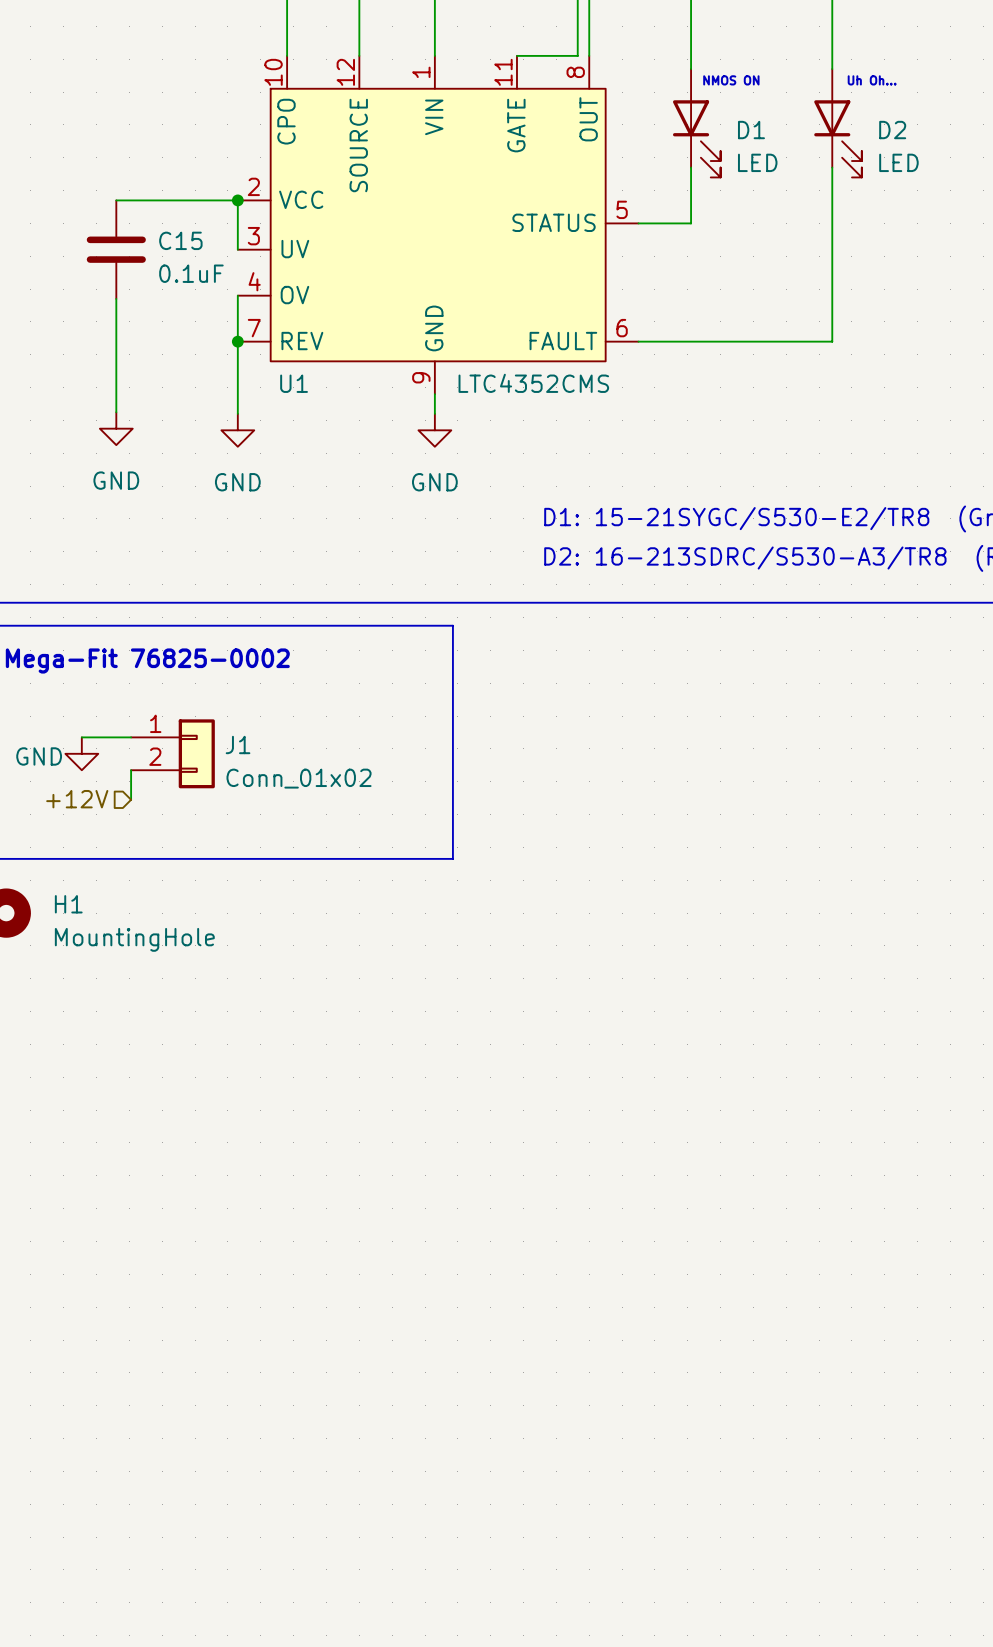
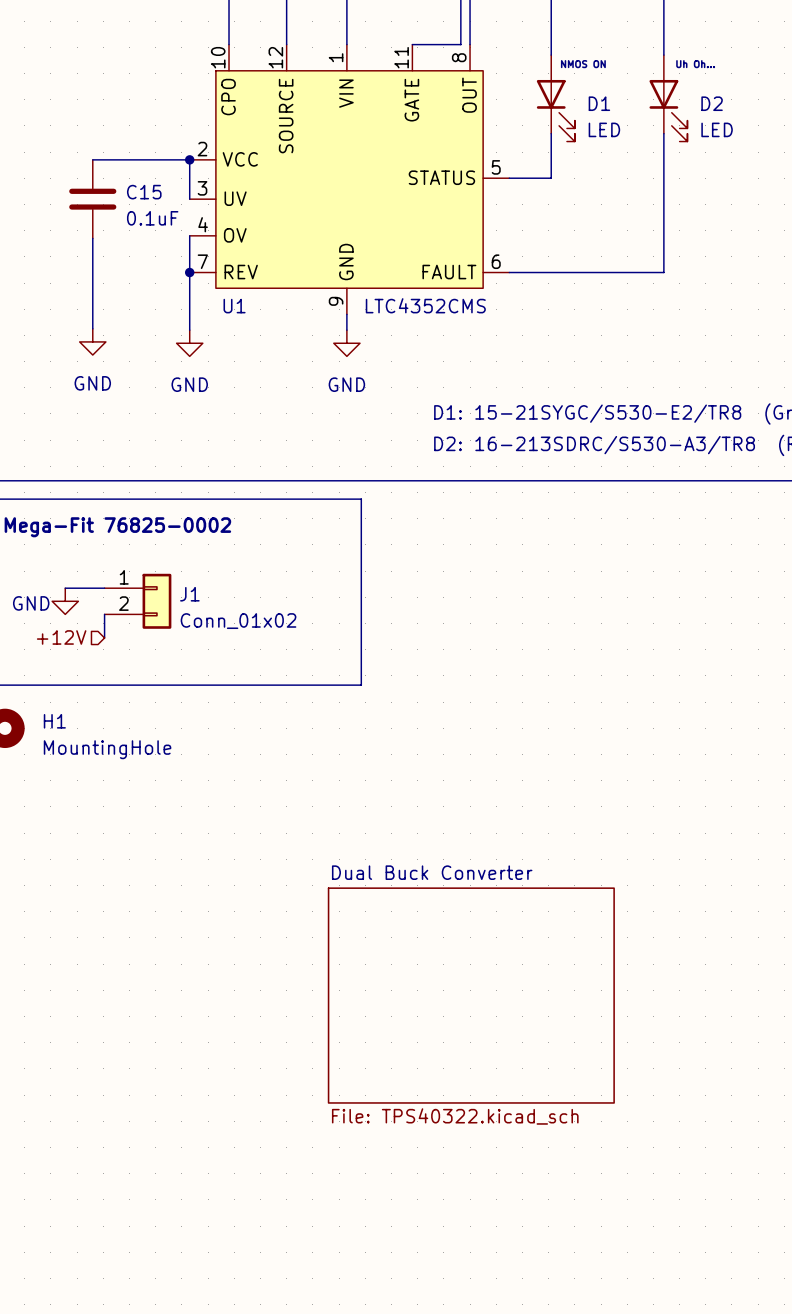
sheet Dual Buck Converter: none -> File: TPS40322.kicad_sch (471, 995)

